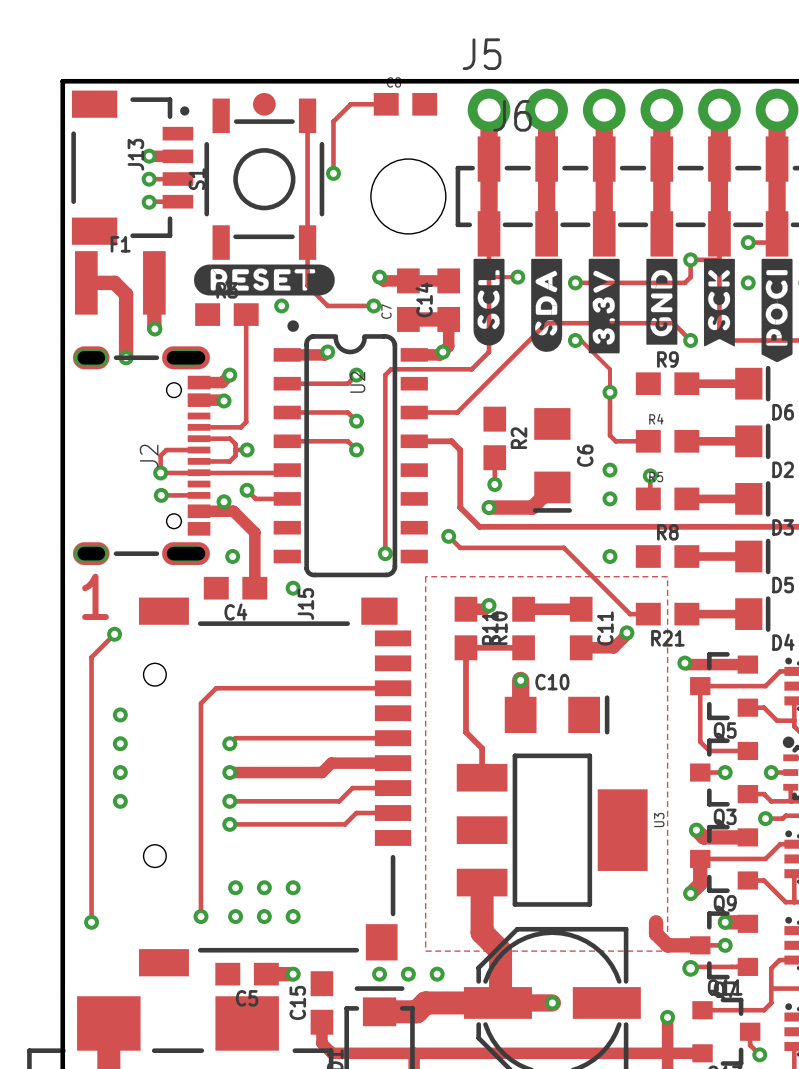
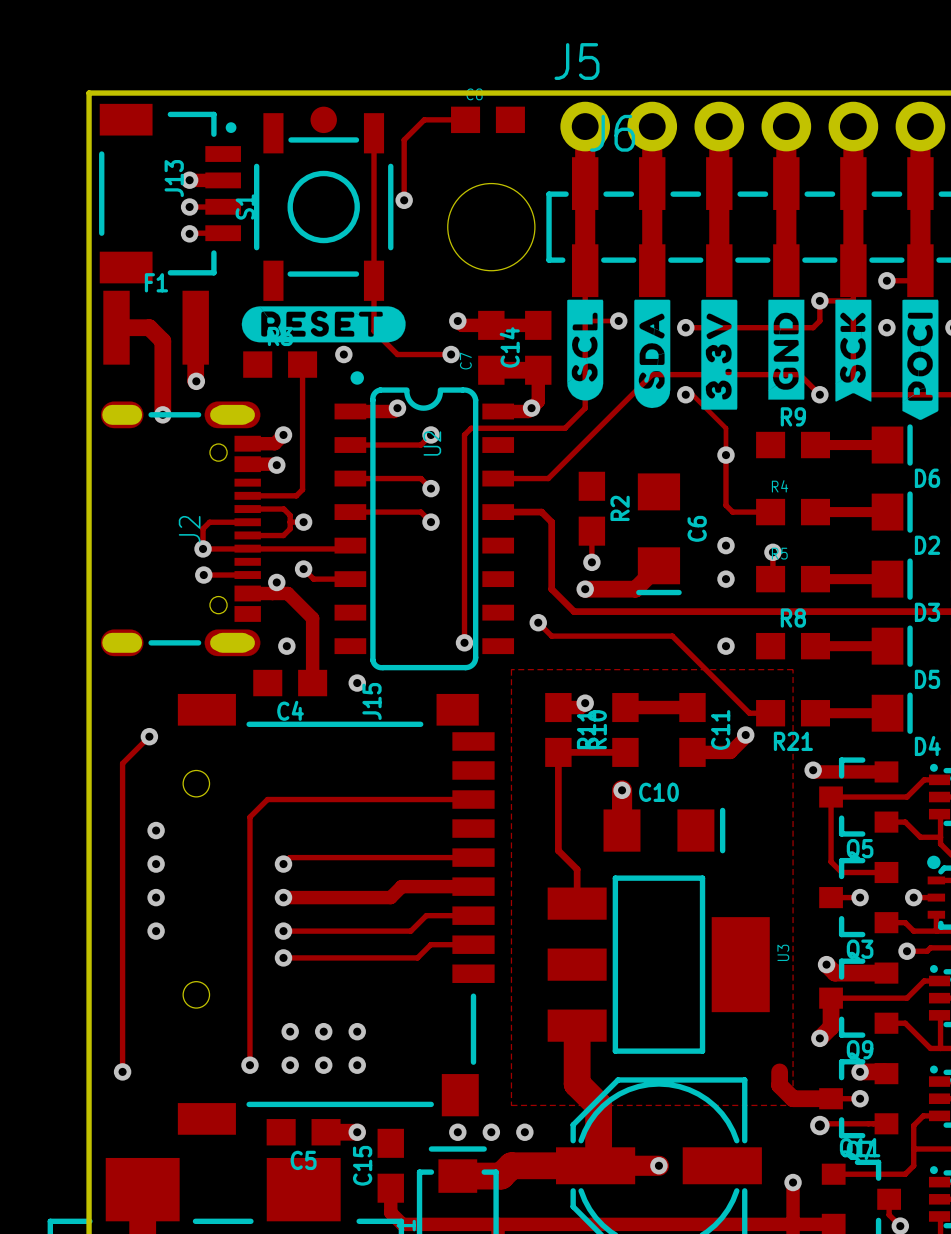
text: 1 (95, 596) -> none

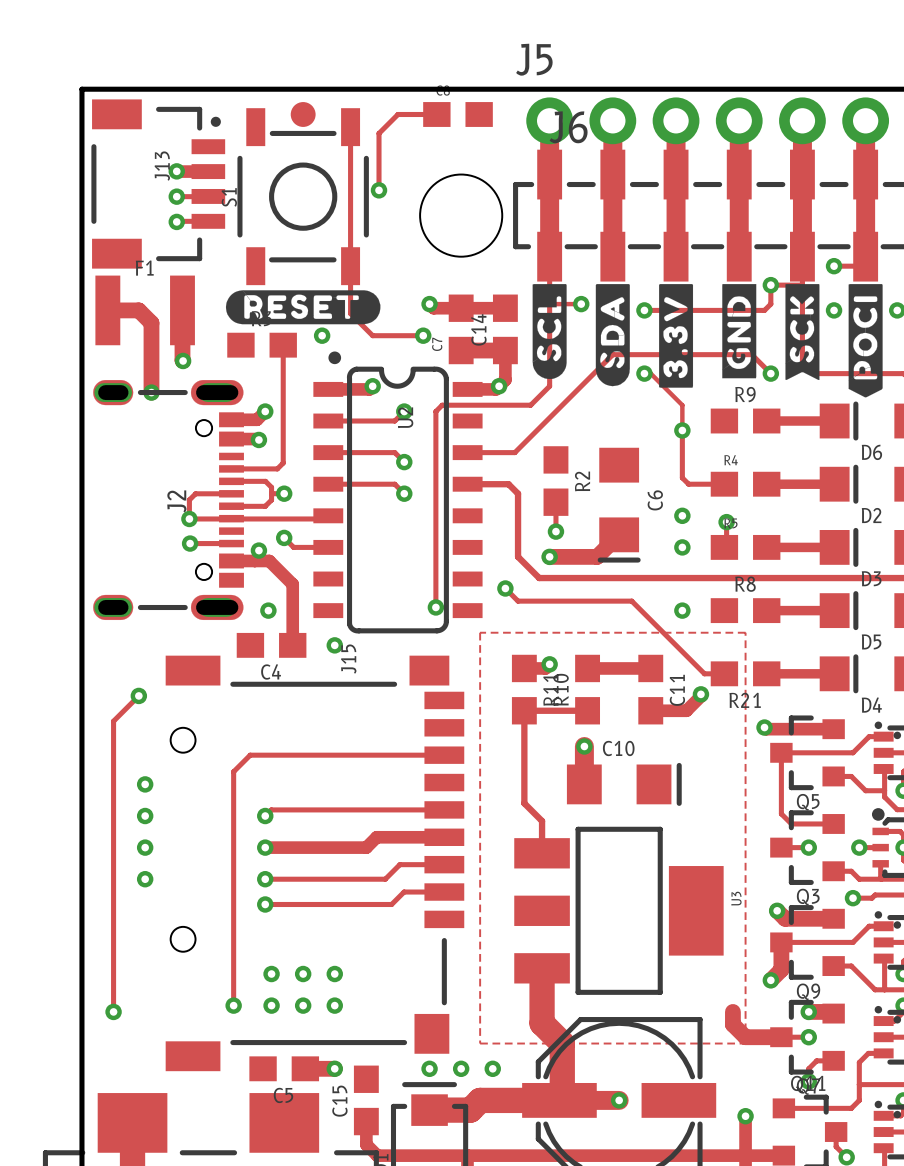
track: (868, 1123) (821, 1123) (819, 1125) -> (816, 1060) (808, 1068) (808, 1081)
via: (819, 1125) -> none
via: none -> (808, 1081)

